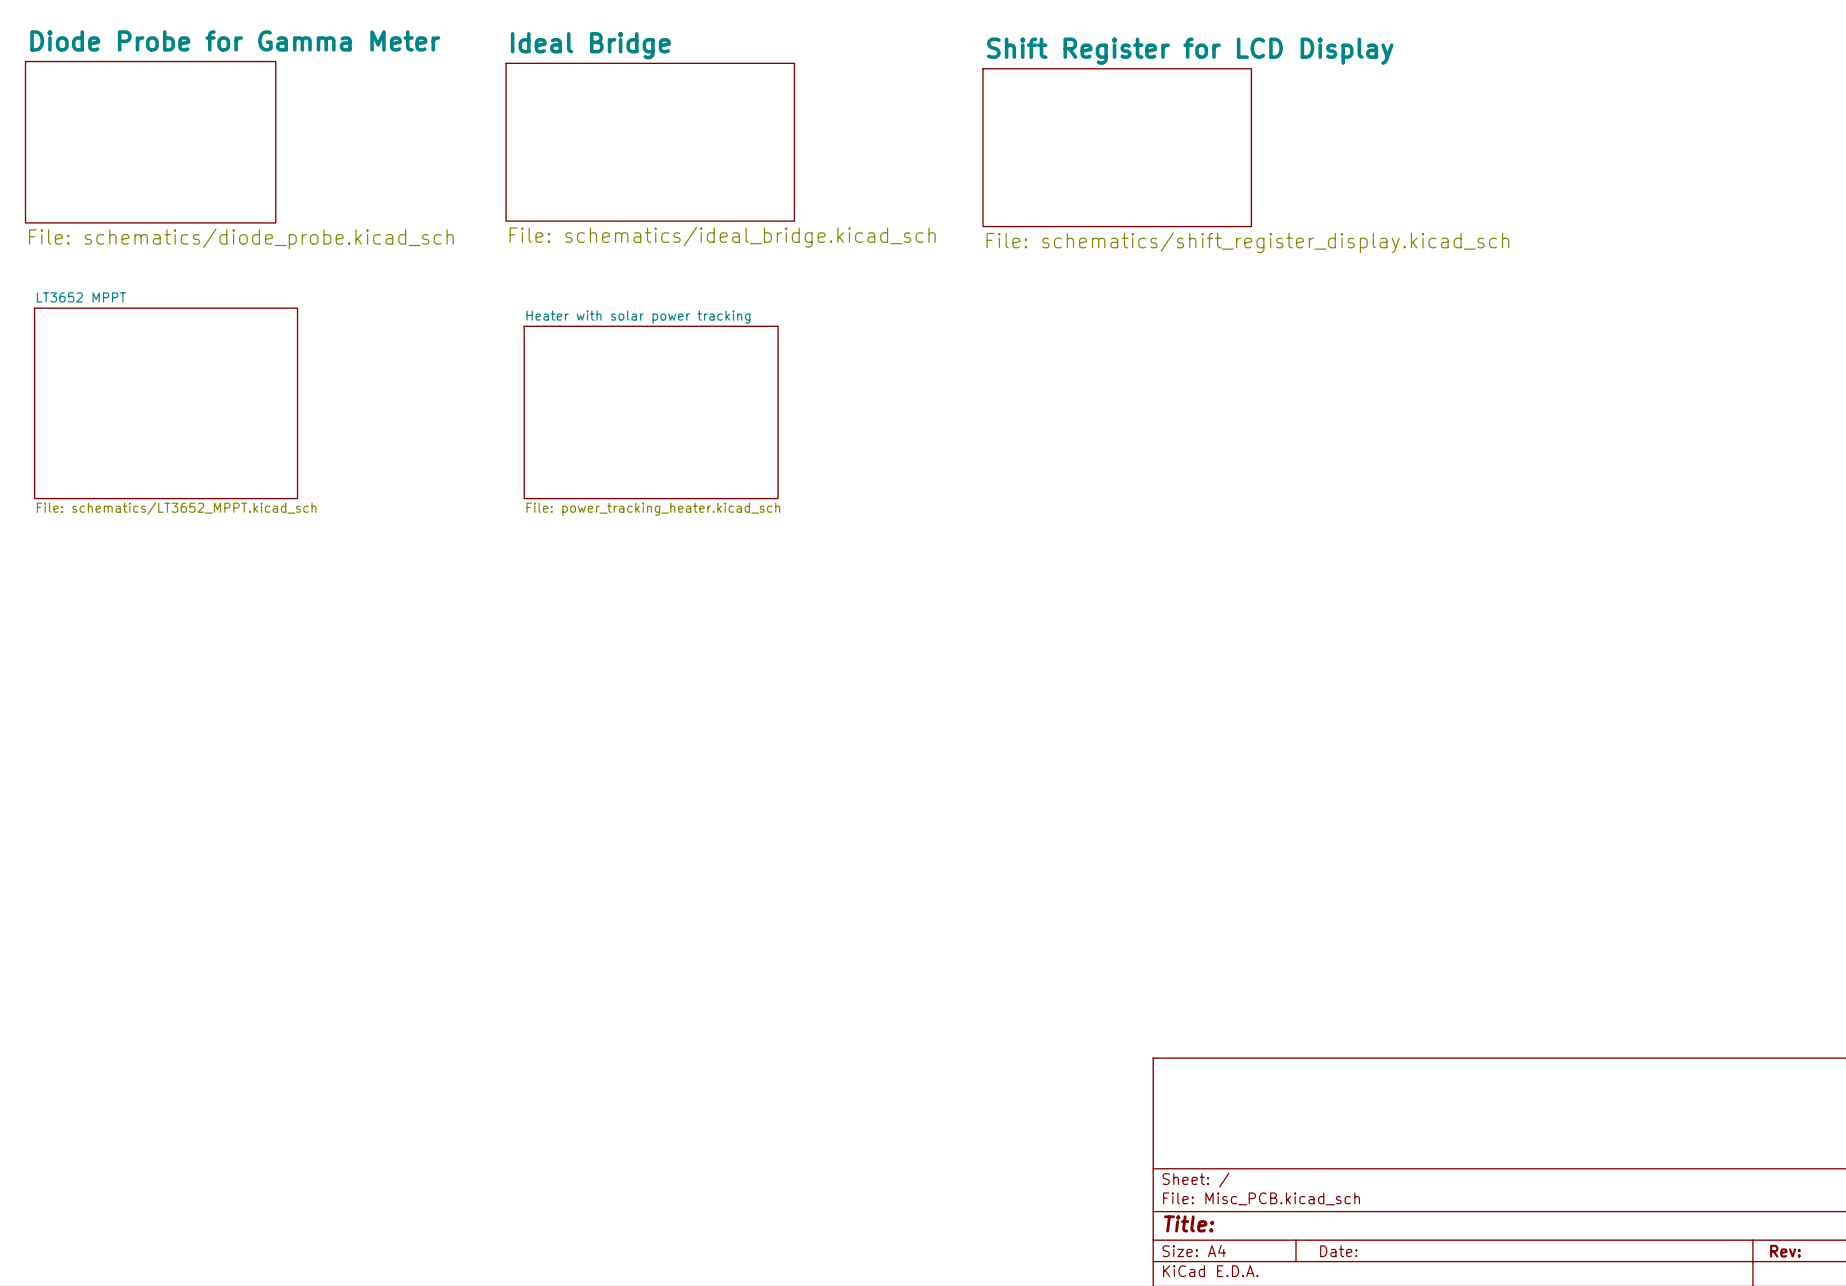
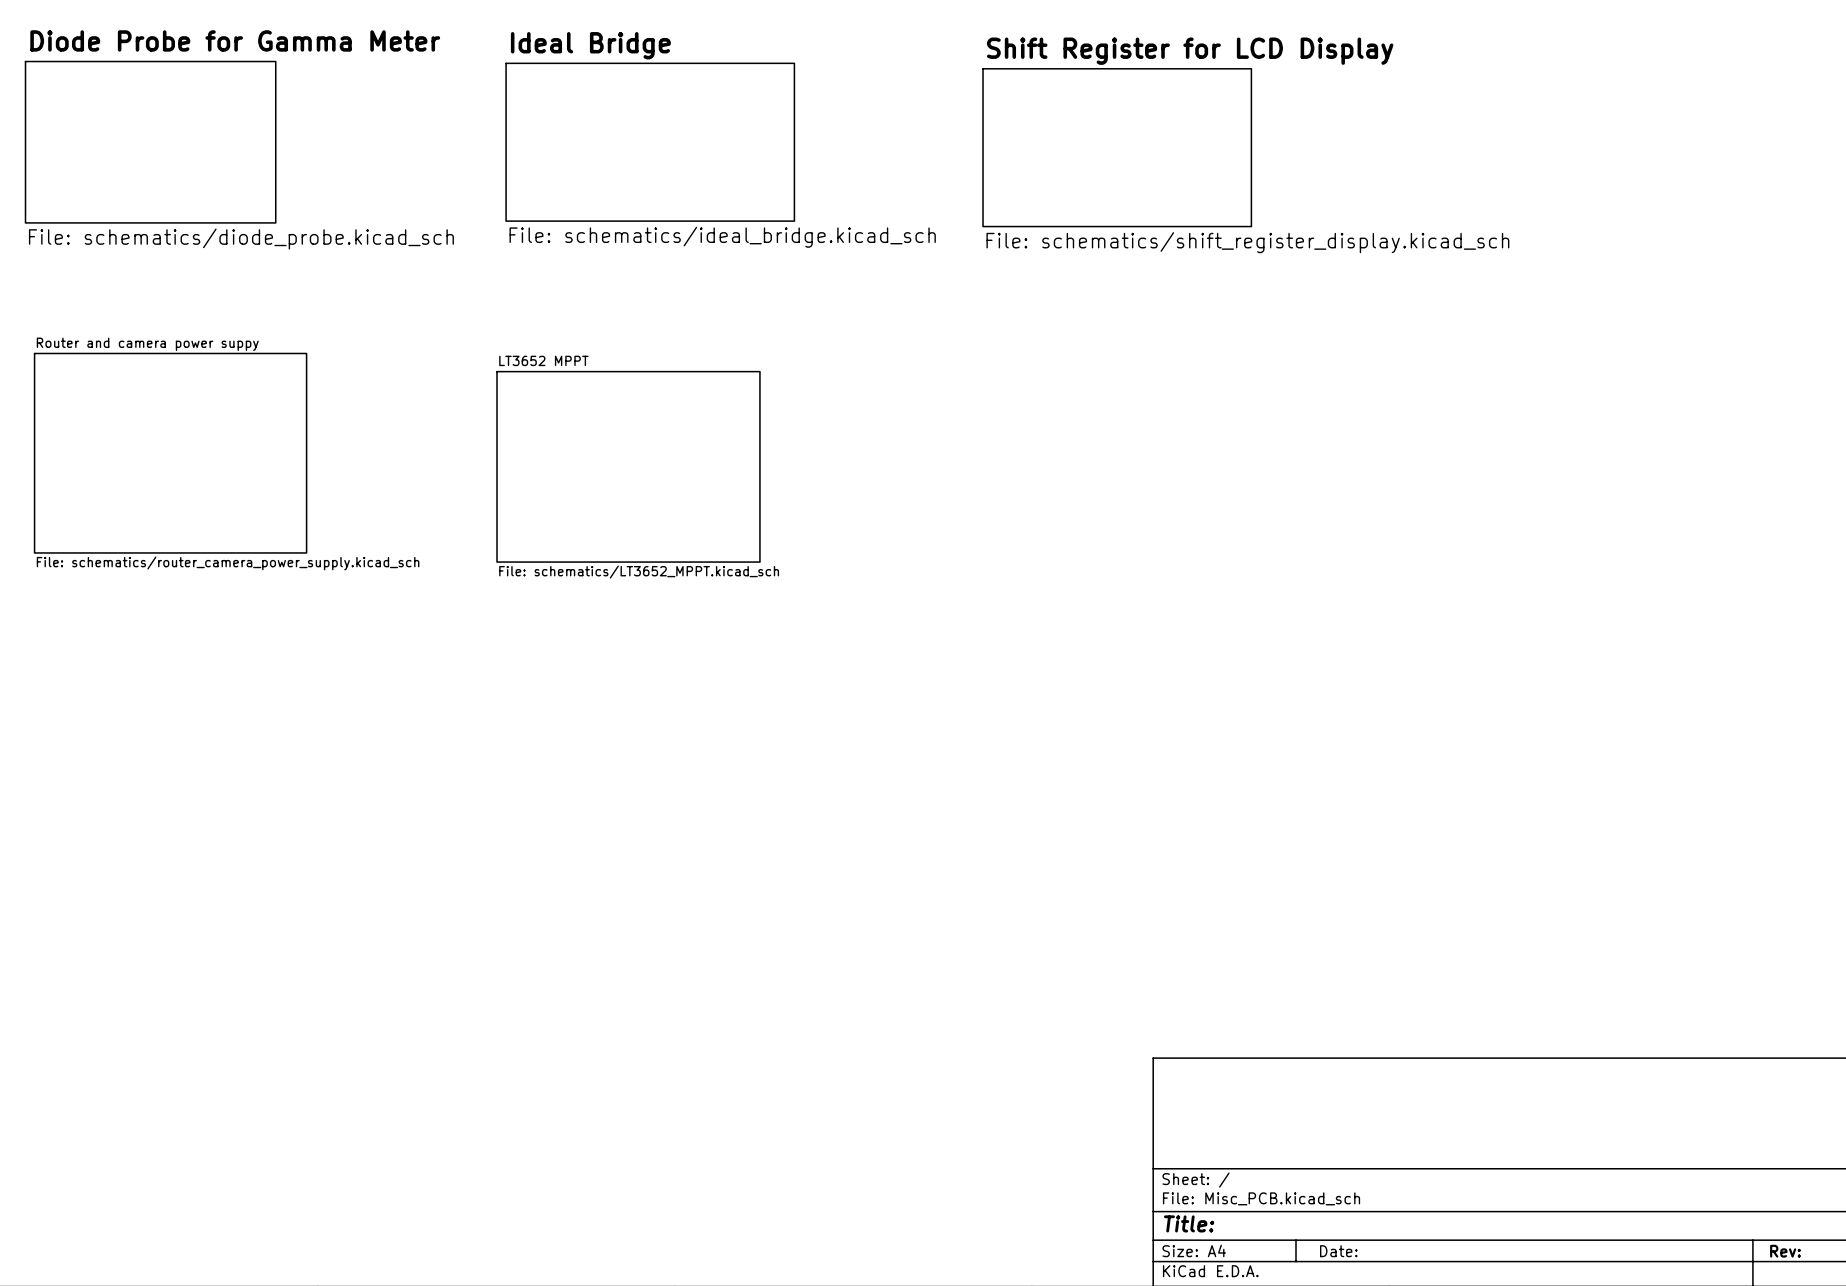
sheet LT3652 MPPT position: (166, 403) -> (628, 466)
sheet Heater with solar power tracking: File: power_tracking_heater.kicad_sch (651, 412) -> none
sheet Router and camera power suppy: none -> File: schematics/router_camera_power_supply.kicad_sch (170, 453)

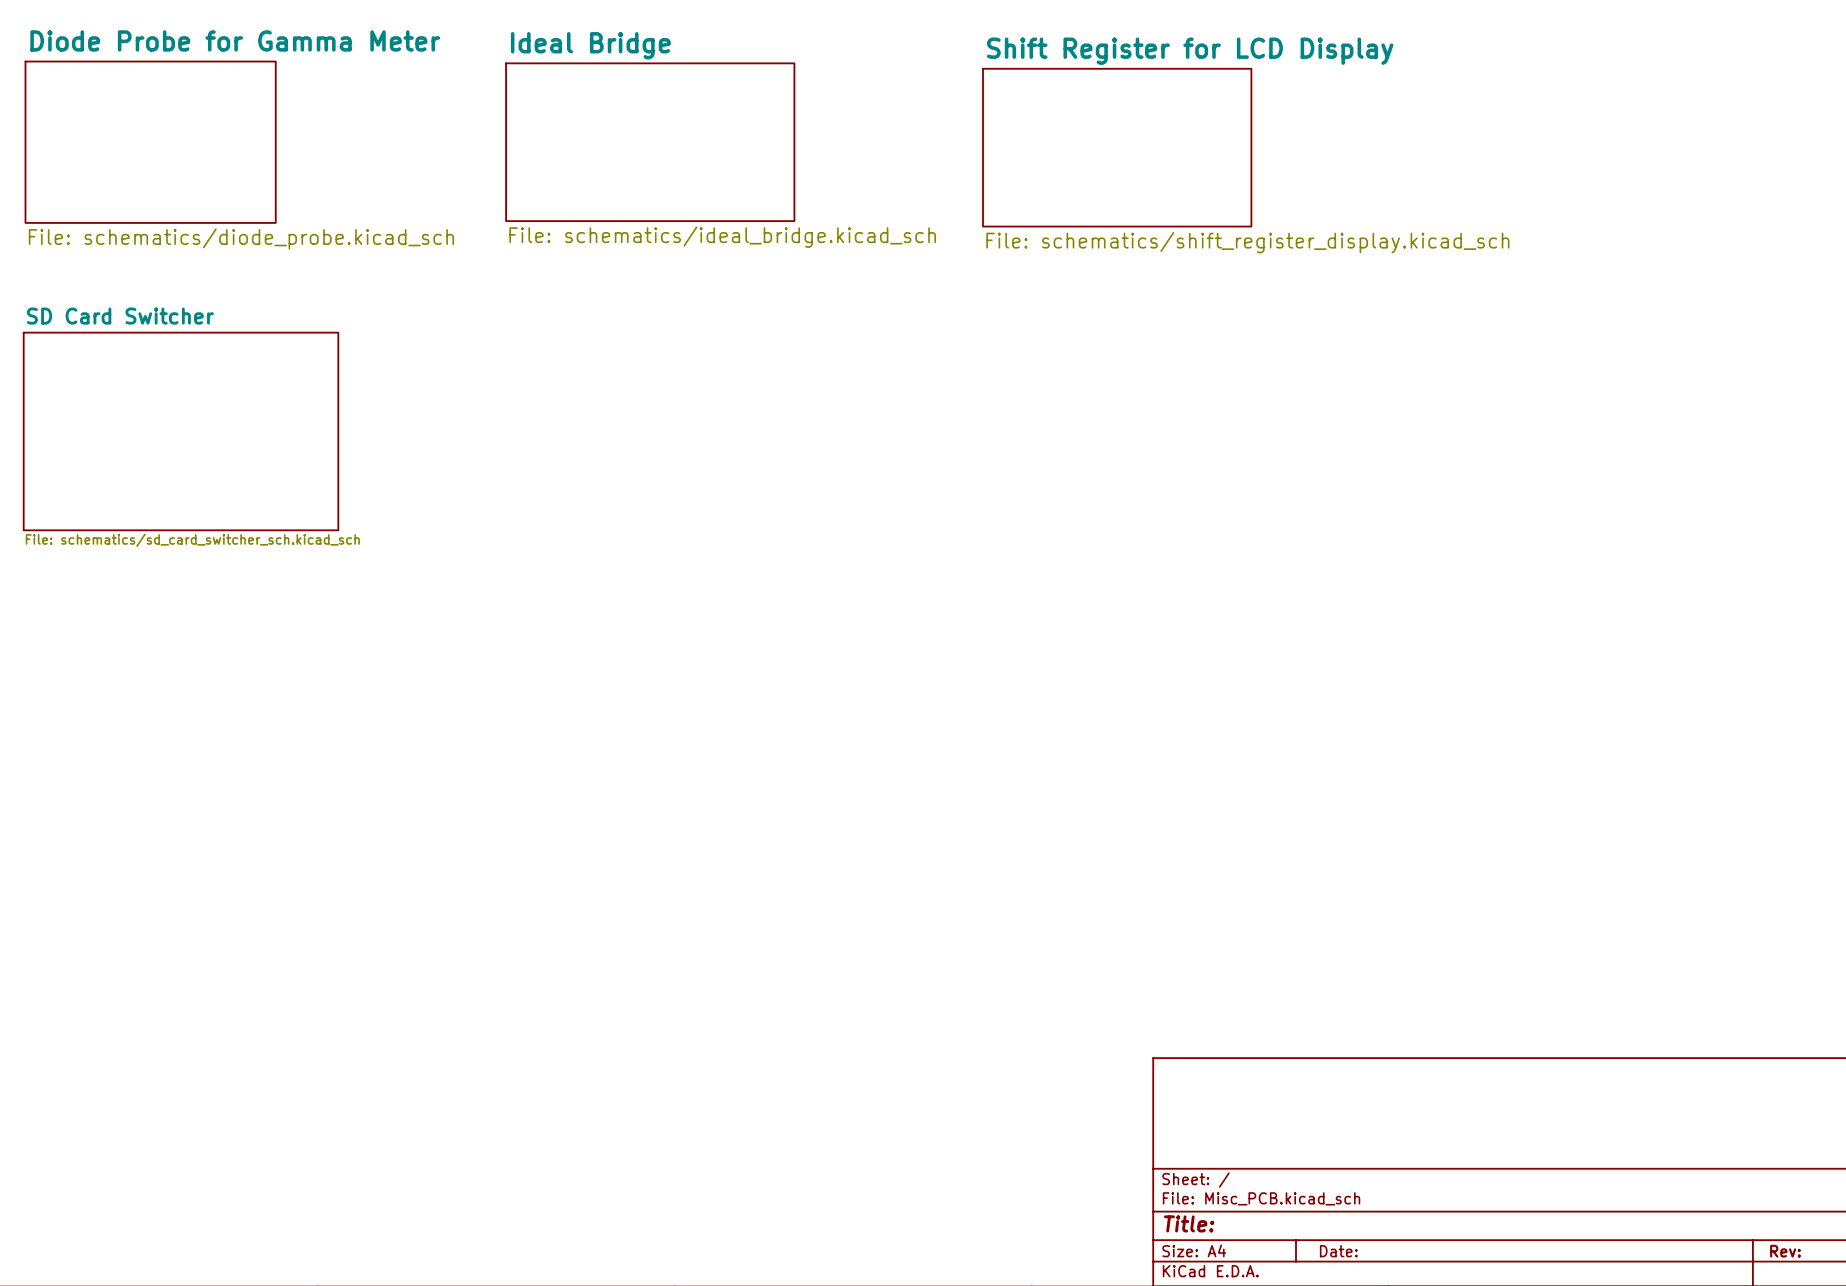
sheet SD Card Switcher: none -> File: schematics/sd_card_switcher_sch.kicad_sch (181, 431)
sheet Router and camera power suppy: File: schematics/router_camera_power_supply.kicad_sch (170, 453) -> none
sheet LT3652 MPPT: File: schematics/LT3652_MPPT.kicad_sch (628, 466) -> none

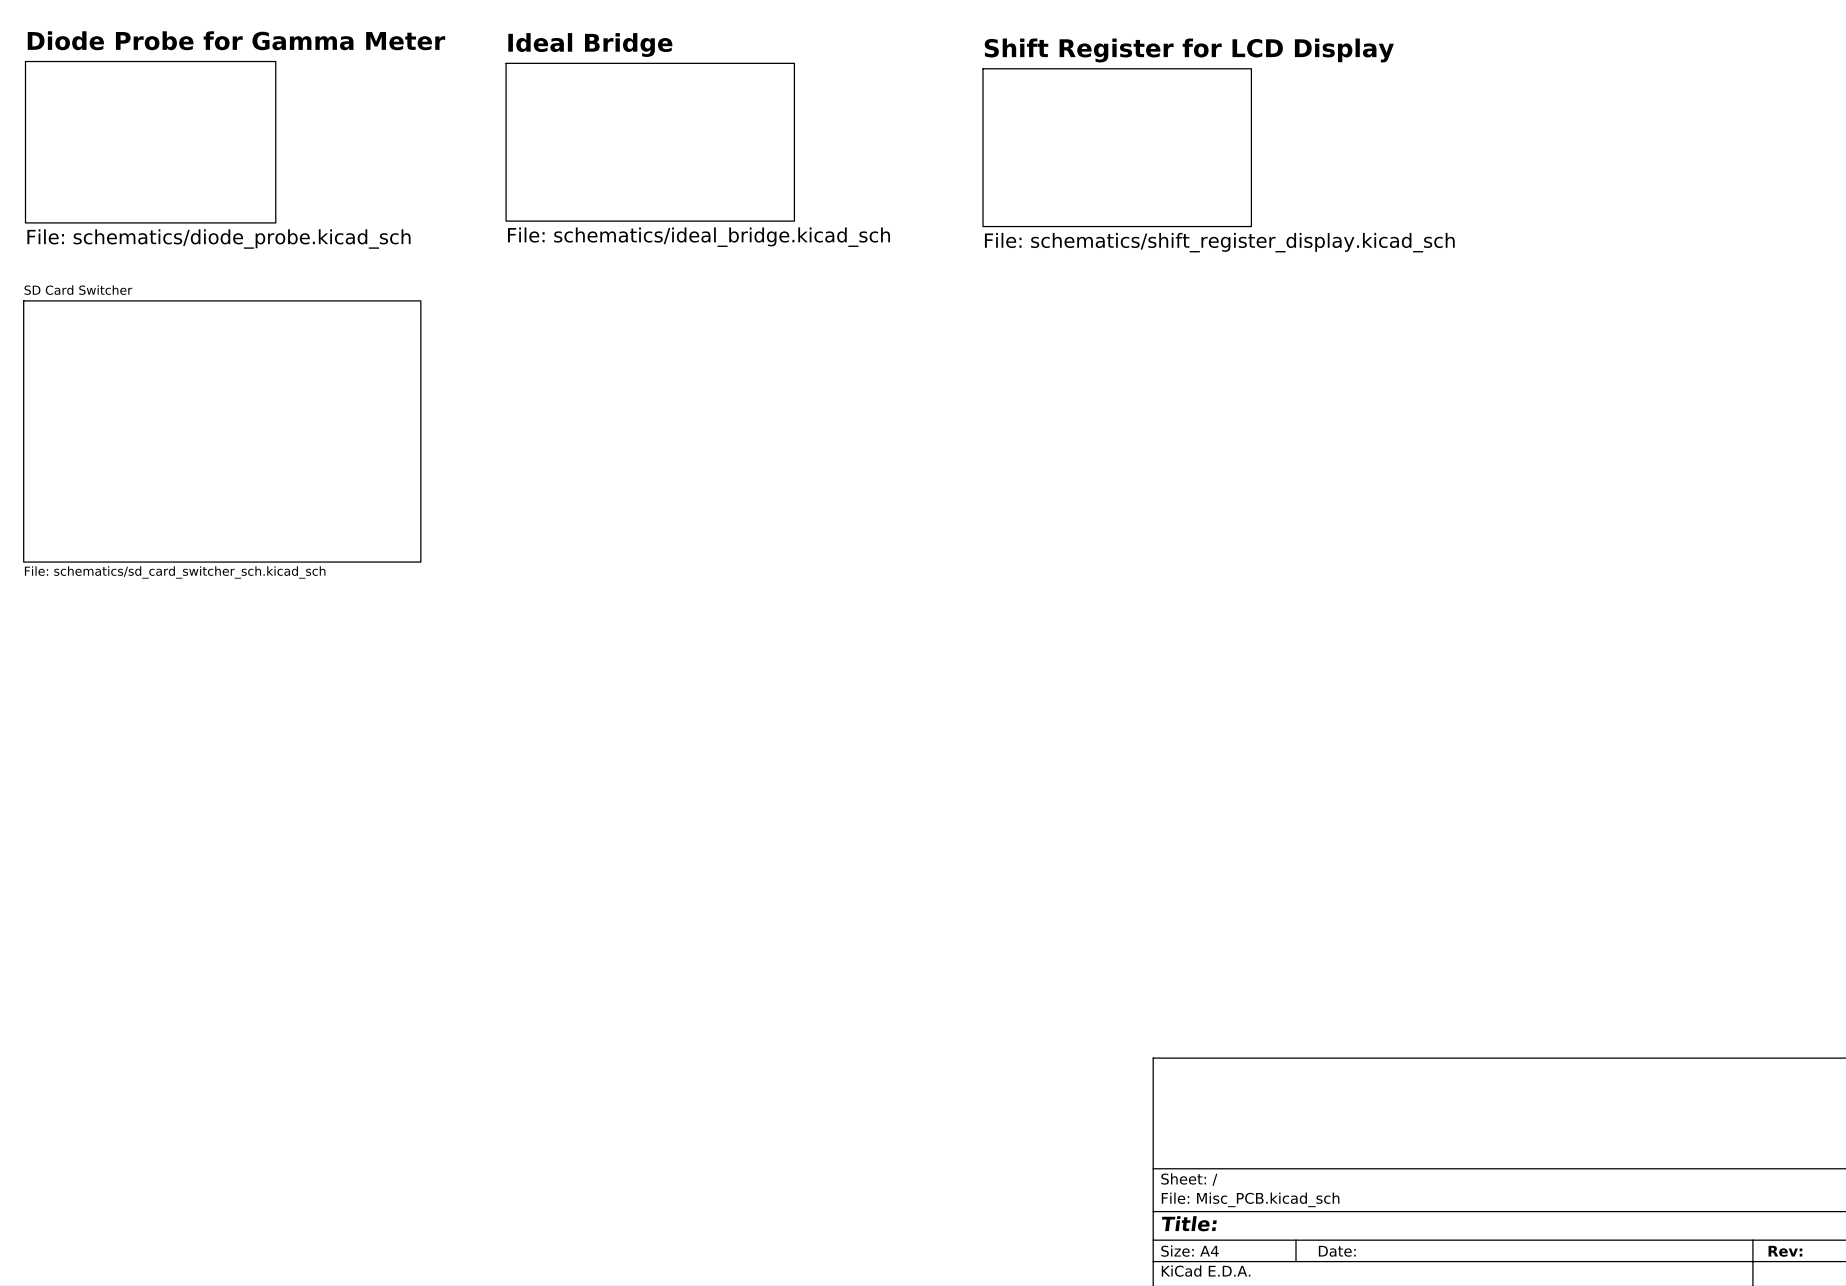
sheet SD Card Switcher: File: schematics/sd_card_switcher_sch.kicad_sch (181, 431) -> none
sheet SD Card Switcher: none -> File: schematics/sd_card_switcher_sch.kicad_sch (222, 431)

